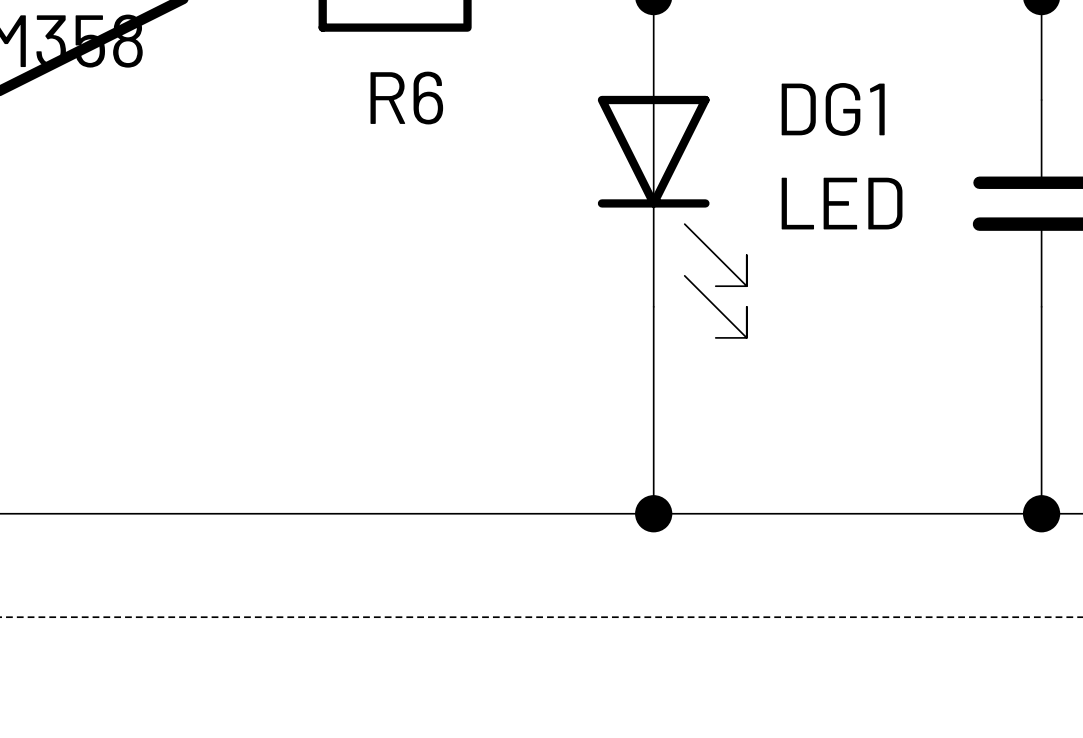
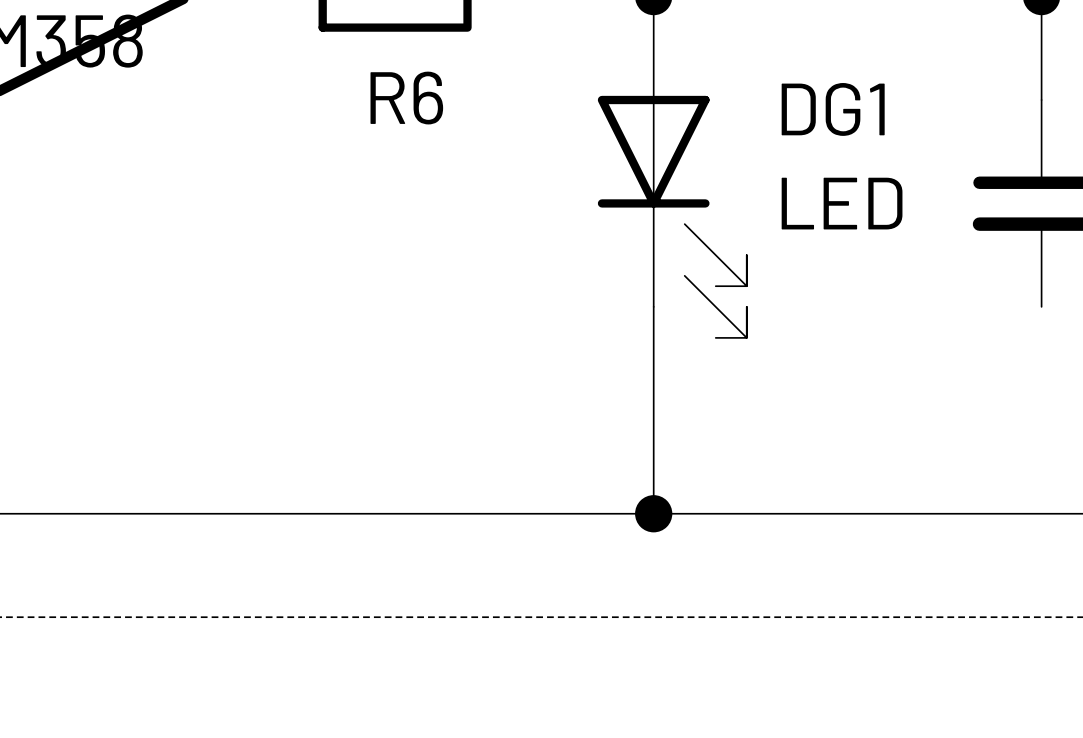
wire: (1041, 306) (1041, 513) -> none
junction: (1041, 513) -> none

